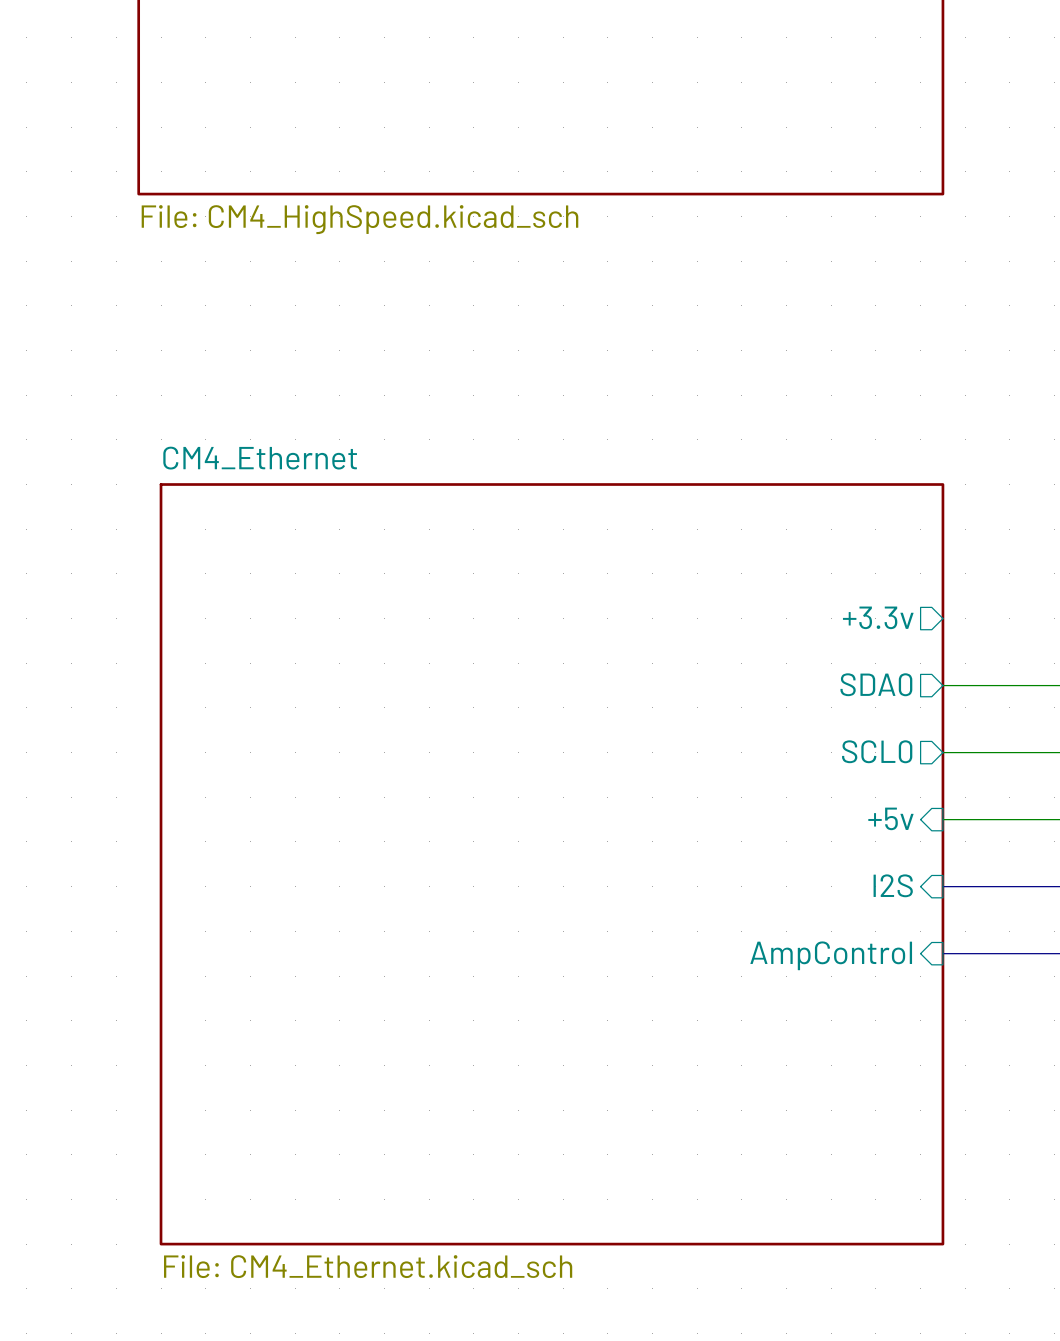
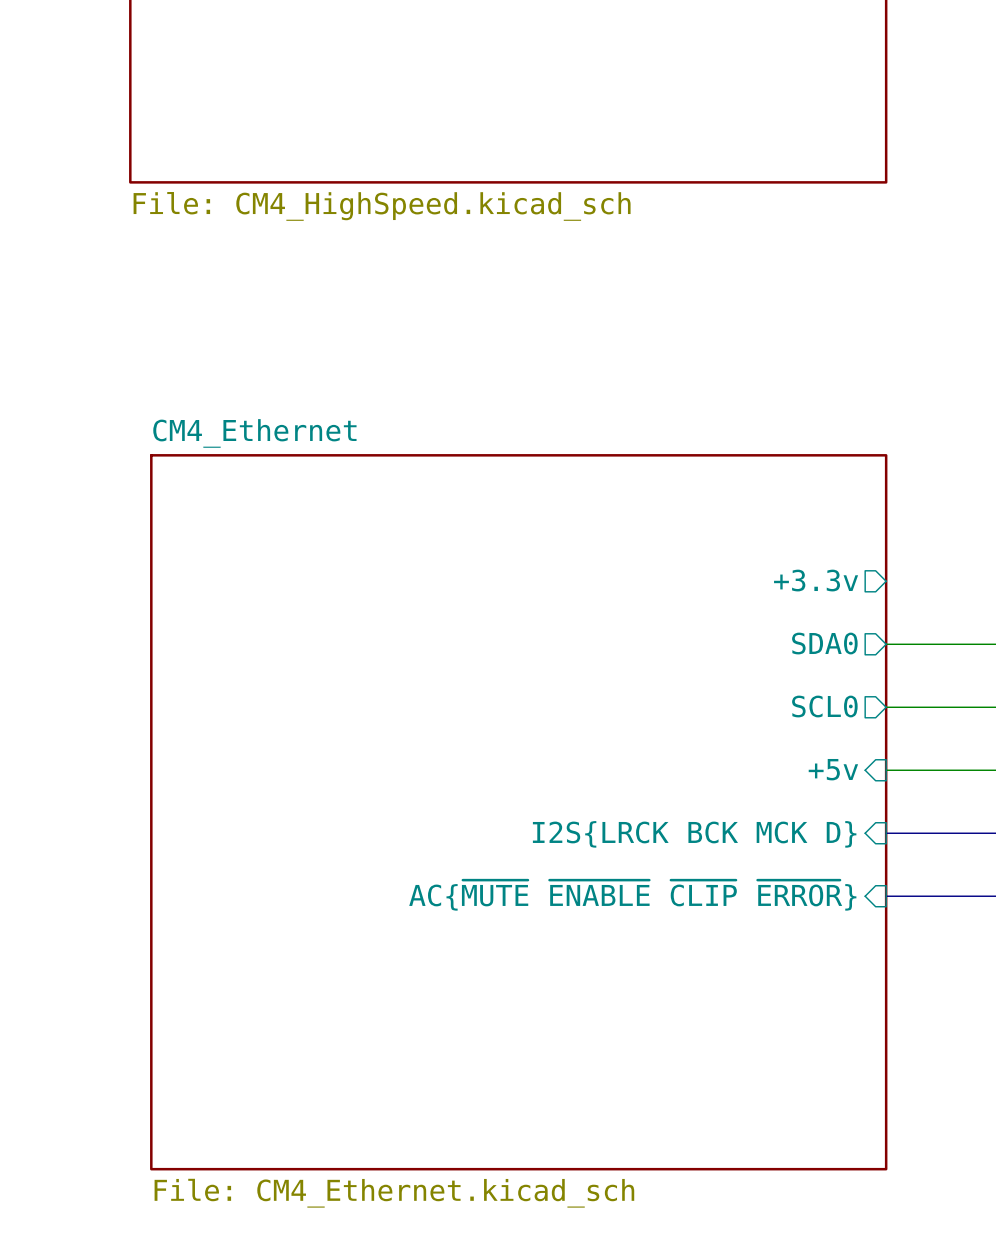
sheet pin: I2S (893, 885) -> I2S{LRCK BCK MCK D} (694, 834)
sheet pin: AmpControl (831, 955) -> AC{~{MUTE} ~{ENABLE} ~{CLIP} ~{ERROR}} (632, 895)

